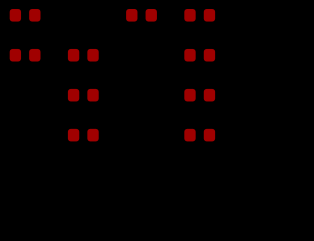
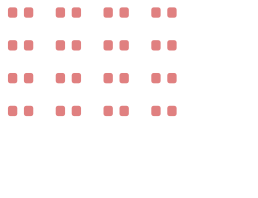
part: none -> (68, 12)
part: none -> (116, 45)
part: none -> (20, 78)
part: none -> (116, 78)
part: none -> (20, 110)
part: none -> (116, 110)

